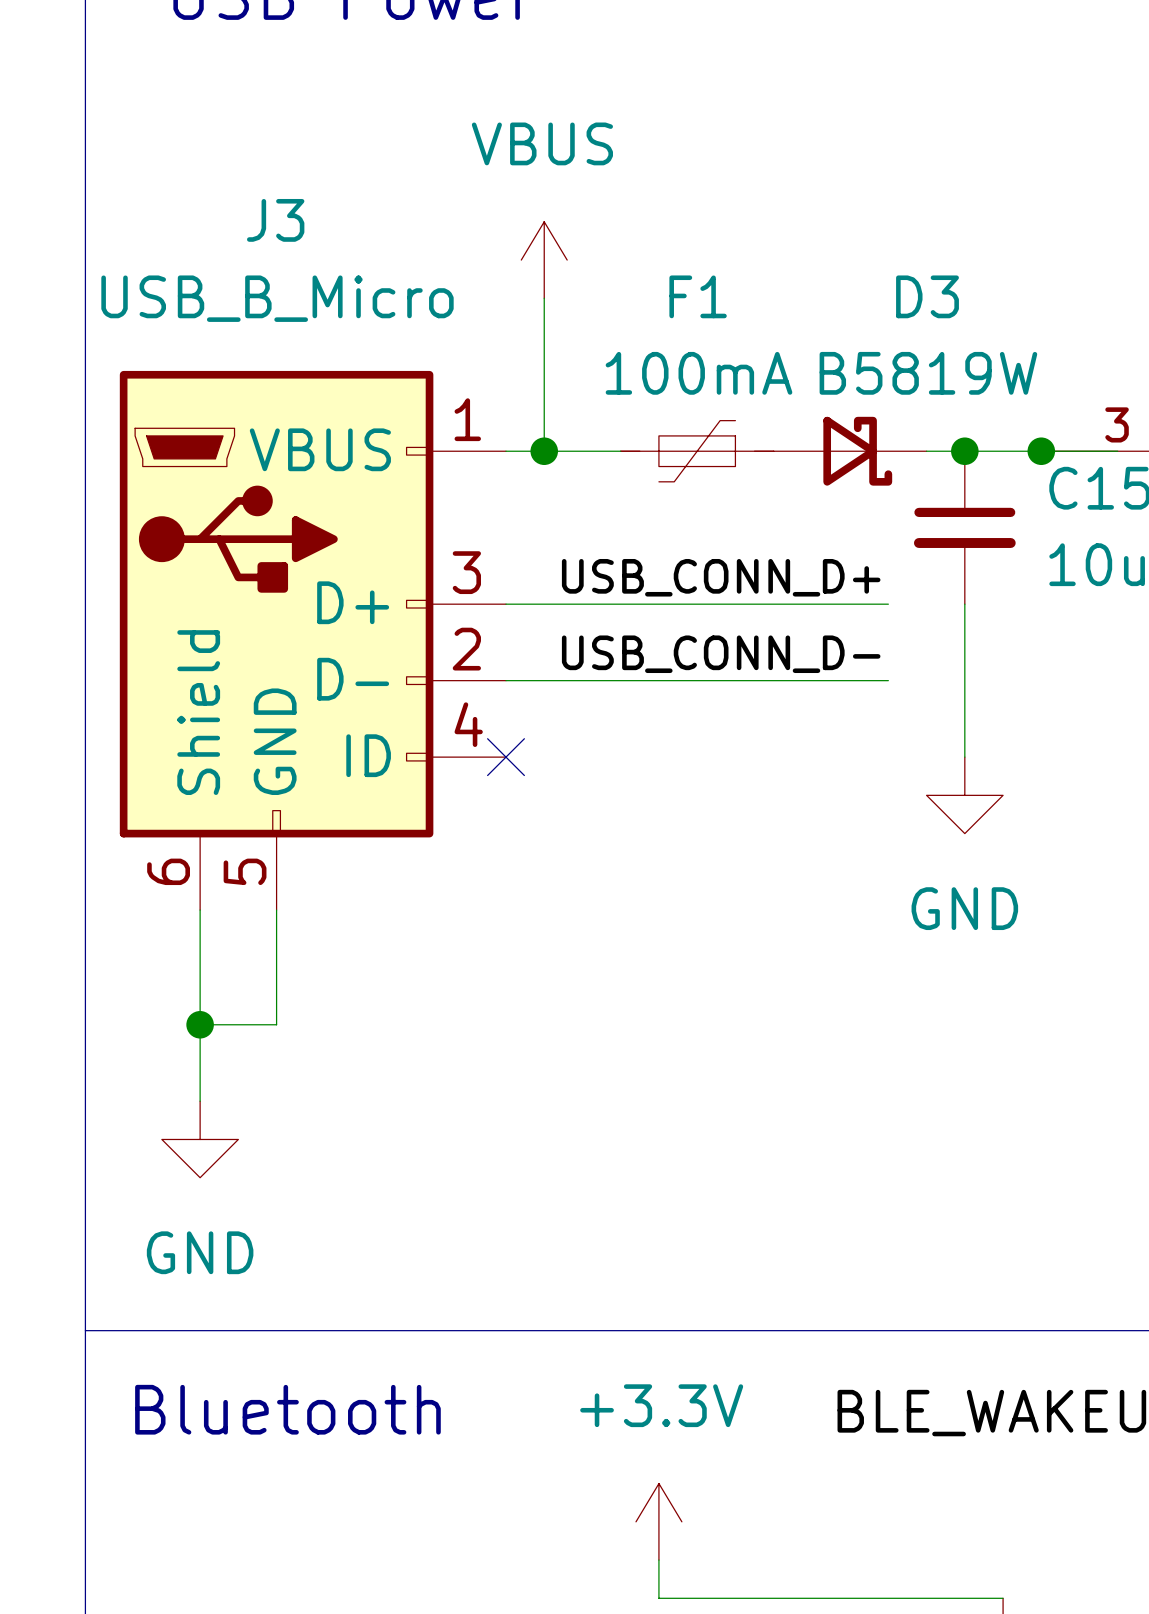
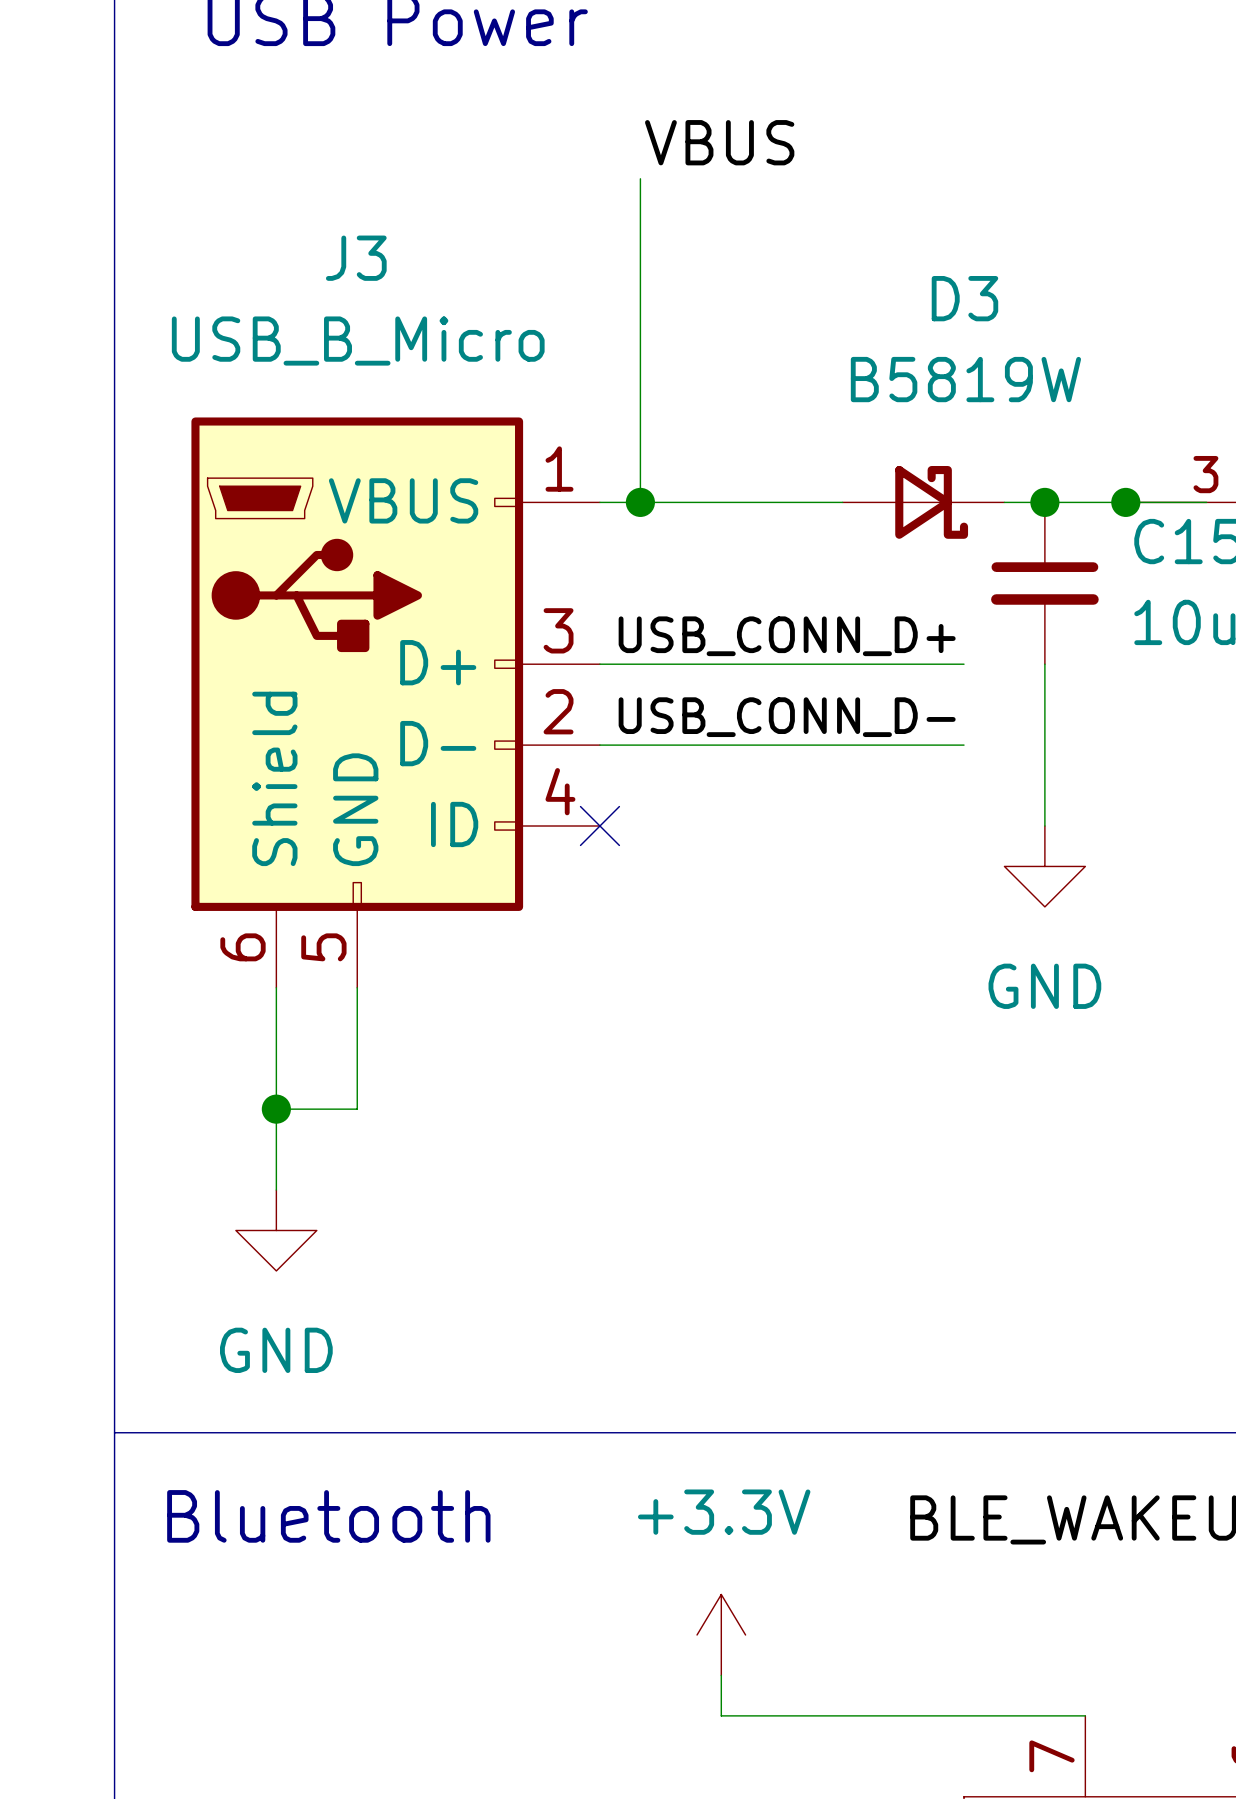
label: none -> VBUS (719, 142)
wire: none -> (640, 178) (640, 502)
power symbol: VBUS (544, 260) -> none
D3 name position: D3 (927, 296) -> D3 (964, 298)
wire: (544, 298) (544, 451) (506, 451) -> none
D3 value position: B5819W (928, 373) -> B5819W (965, 379)
junction position: (544, 451) -> (640, 502)
F1: 100mA (697, 451) -> none
J3 position: (312, 640) -> (395, 702)
no-connect mark position: (506, 757) -> (599, 826)
wire: (200, 910) (200, 1101) -> (276, 987) (276, 1190)
wire: (276, 910) (276, 1024) -> (357, 987) (357, 1109) (316, 1109)
wire: (200, 1024) (238, 1024) -> none
junction position: (200, 1024) -> (276, 1109)
power symbol position: GND (200, 1139) -> GND (276, 1230)

